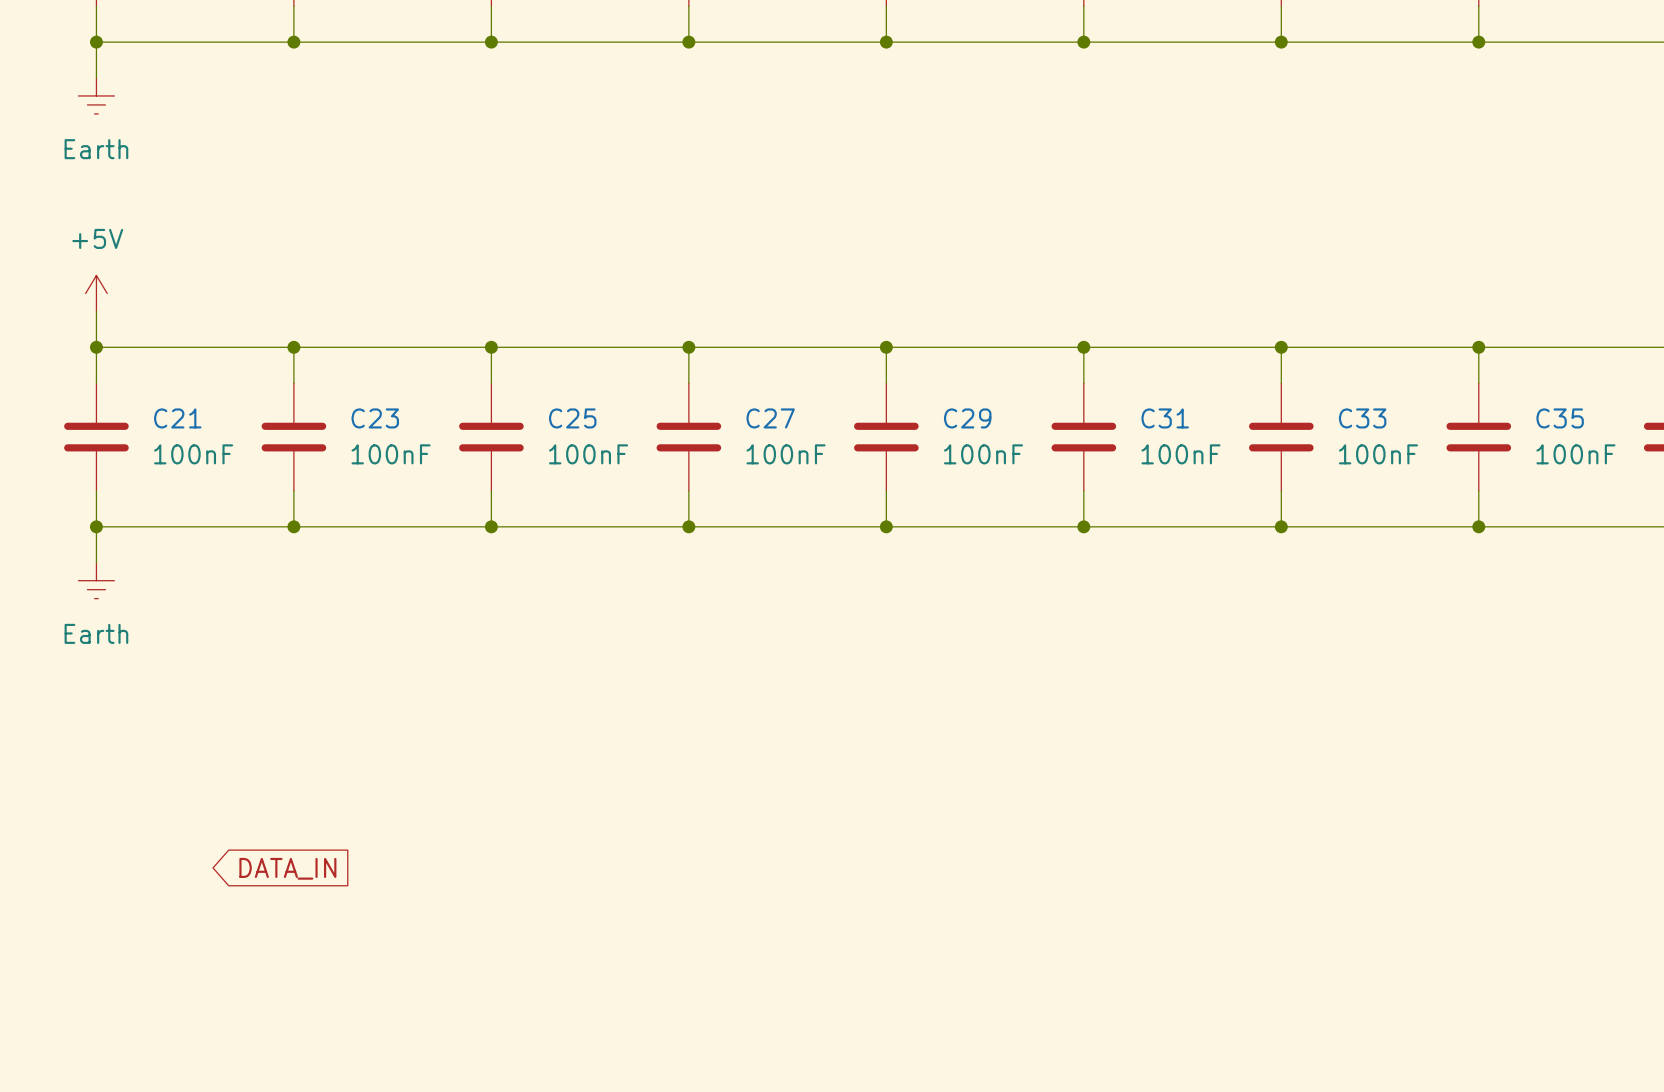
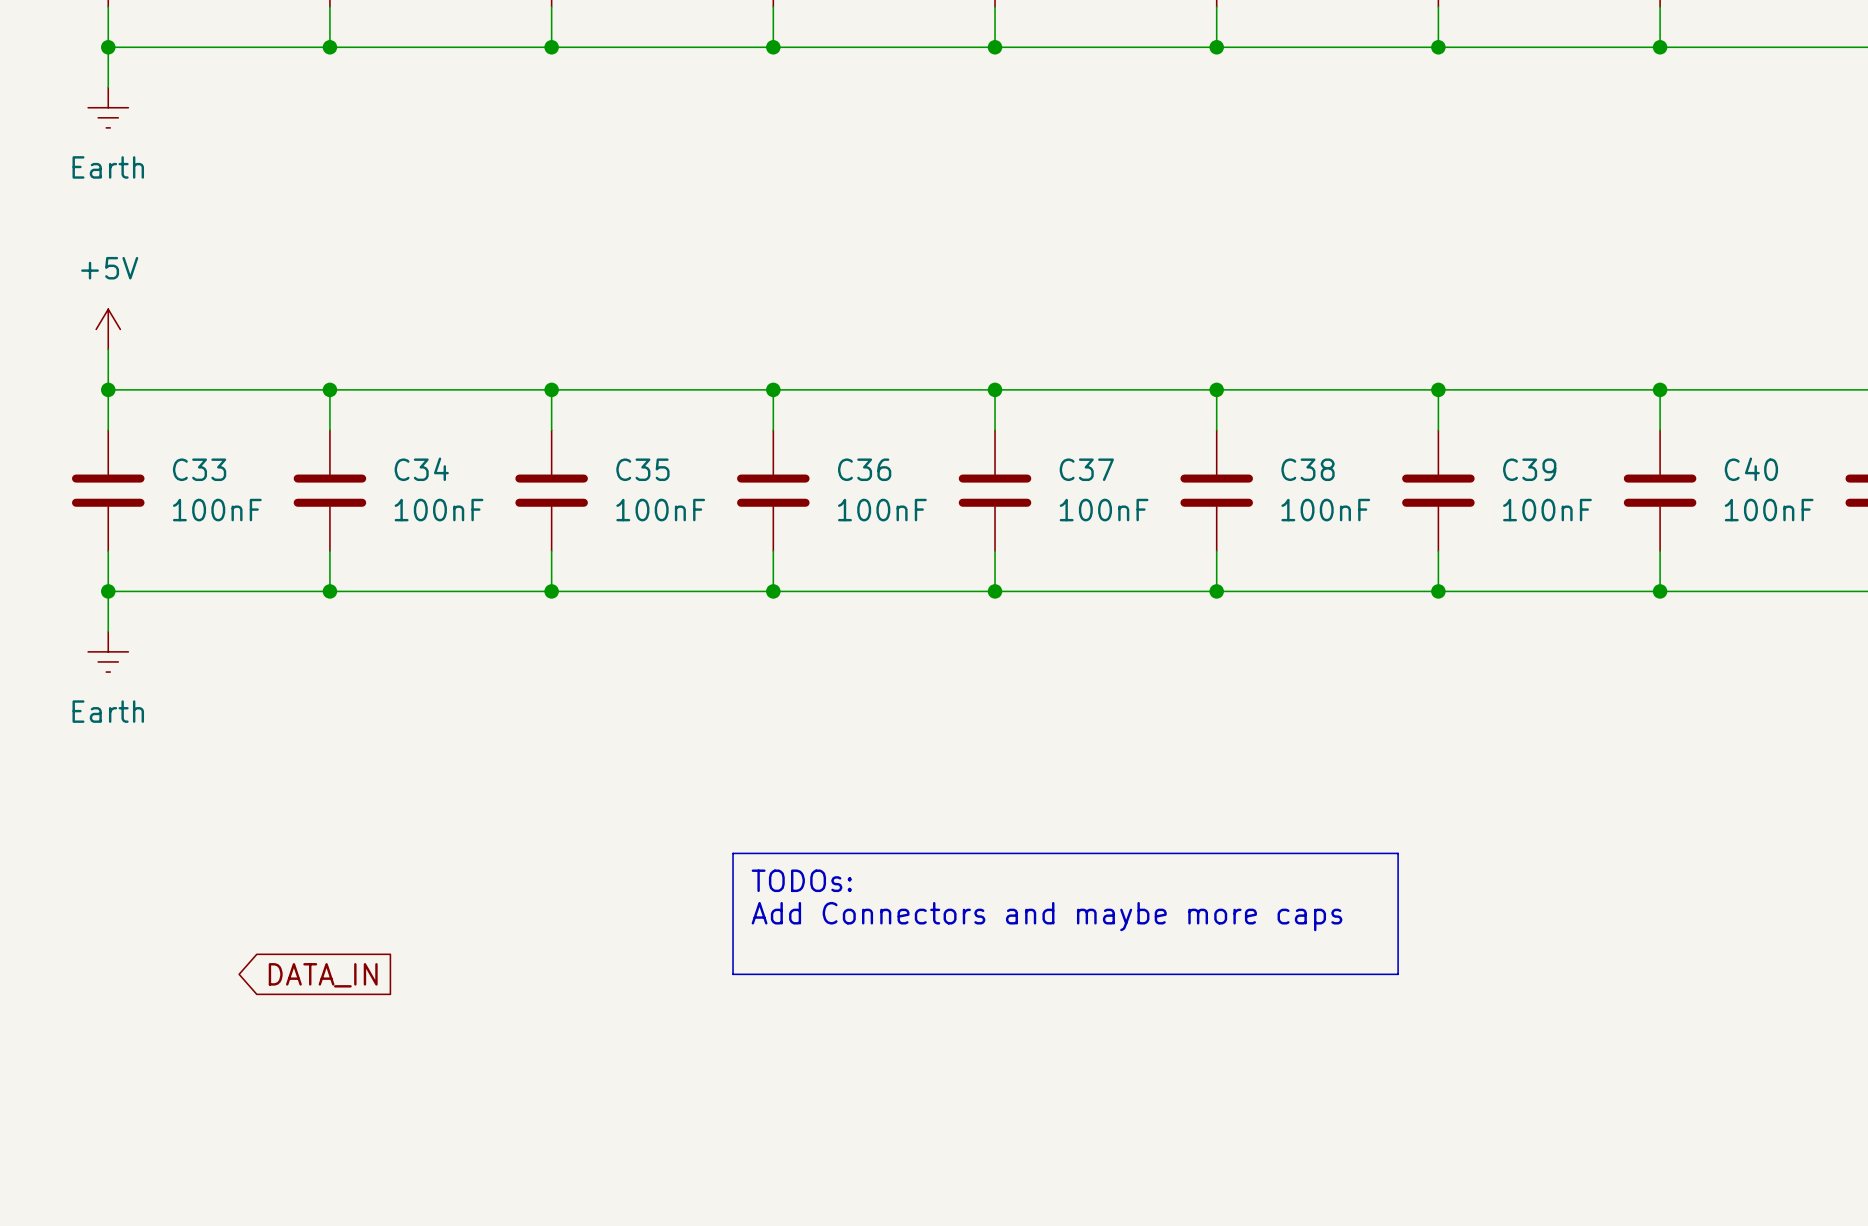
C21 name: C21 (177, 418) -> C33 (199, 469)
C23 name: C23 (375, 418) -> C34 (421, 469)
C25 name: C25 (572, 418) -> C35 (642, 469)
C27 name: C27 (770, 418) -> C36 (864, 469)
C29 name: C29 (967, 418) -> C37 (1086, 469)
C31 name: C31 (1165, 418) -> C38 (1308, 469)
C33 name: C33 (1362, 418) -> C39 (1529, 469)
C35 name: C35 (1560, 418) -> C40 (1751, 469)
line: none -> (733, 853) (1398, 853) (1398, 974) (733, 974) (733, 853)
text: none -> TODOs: (801, 880)
text: none -> Add Connectors and maybe more caps (1046, 916)

